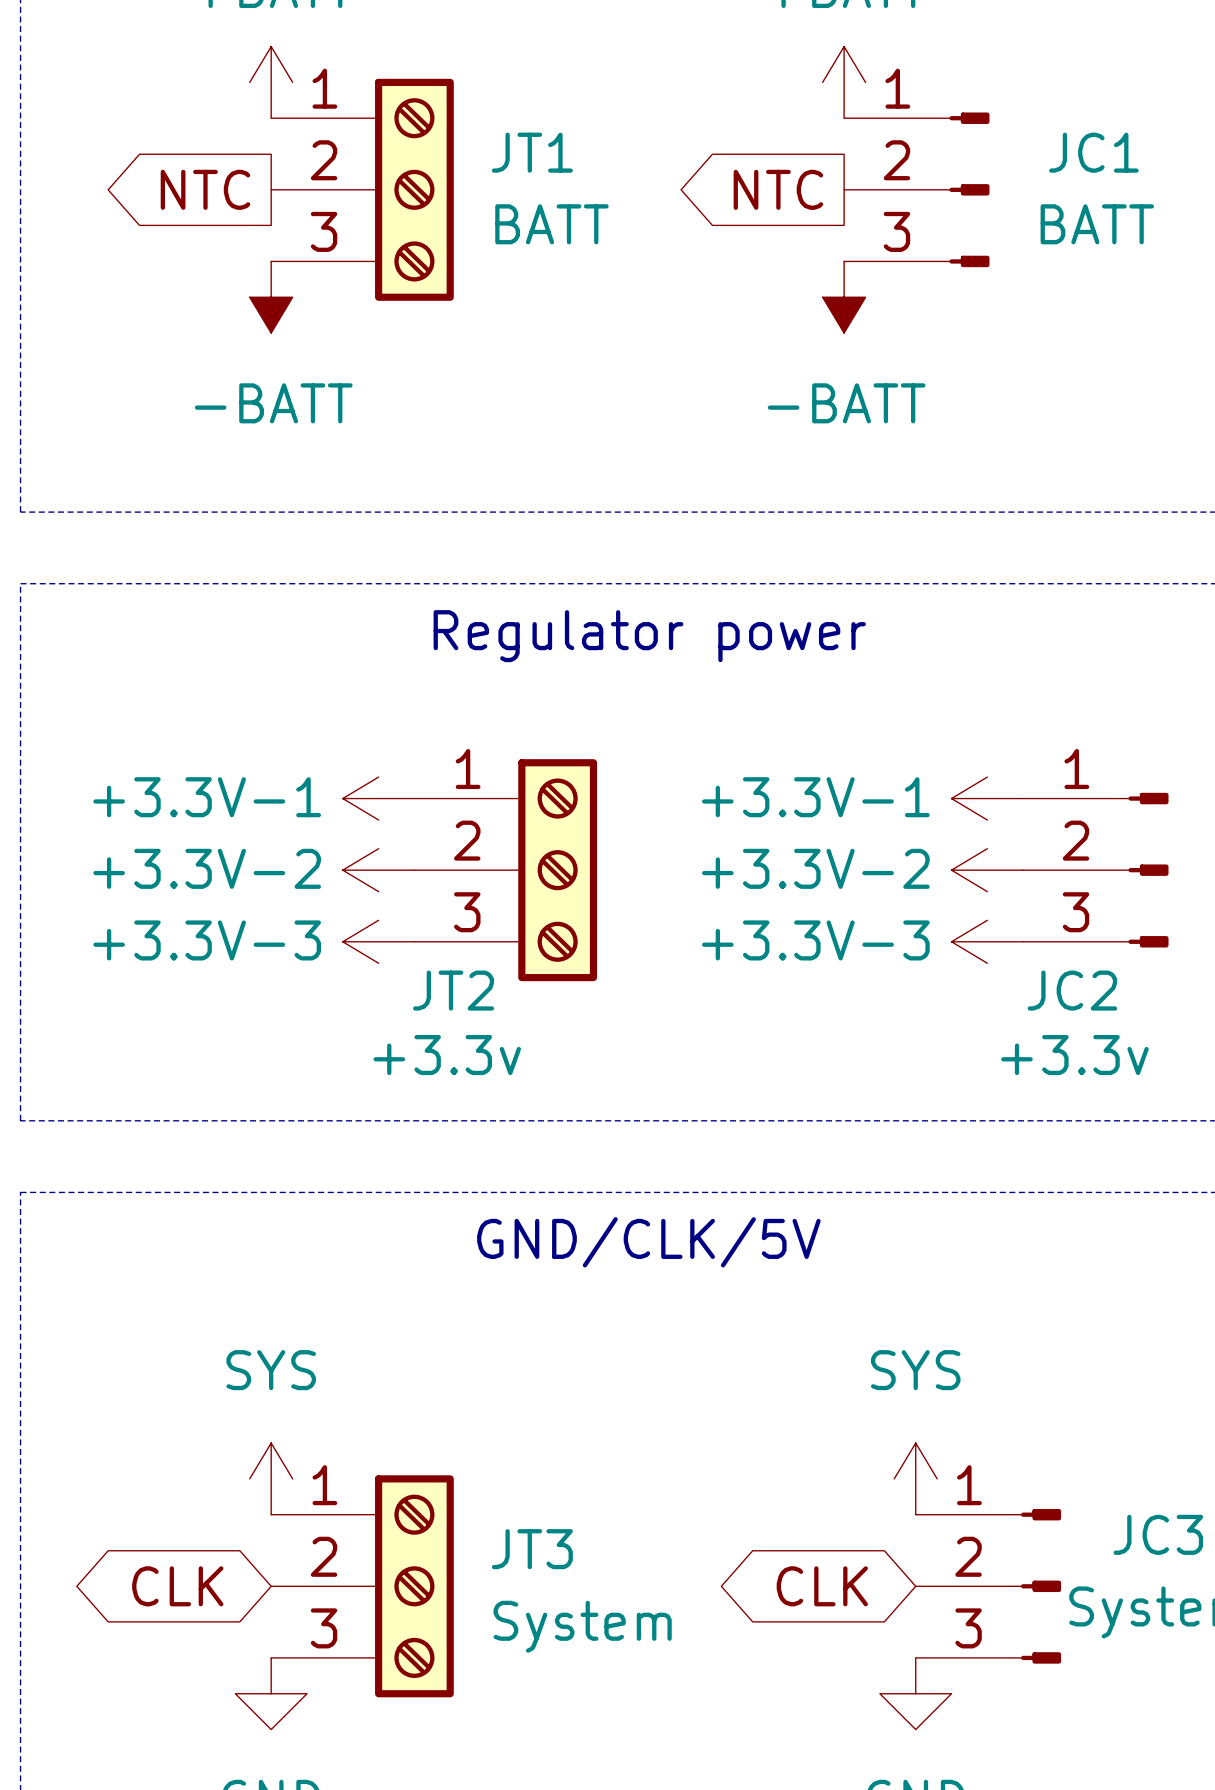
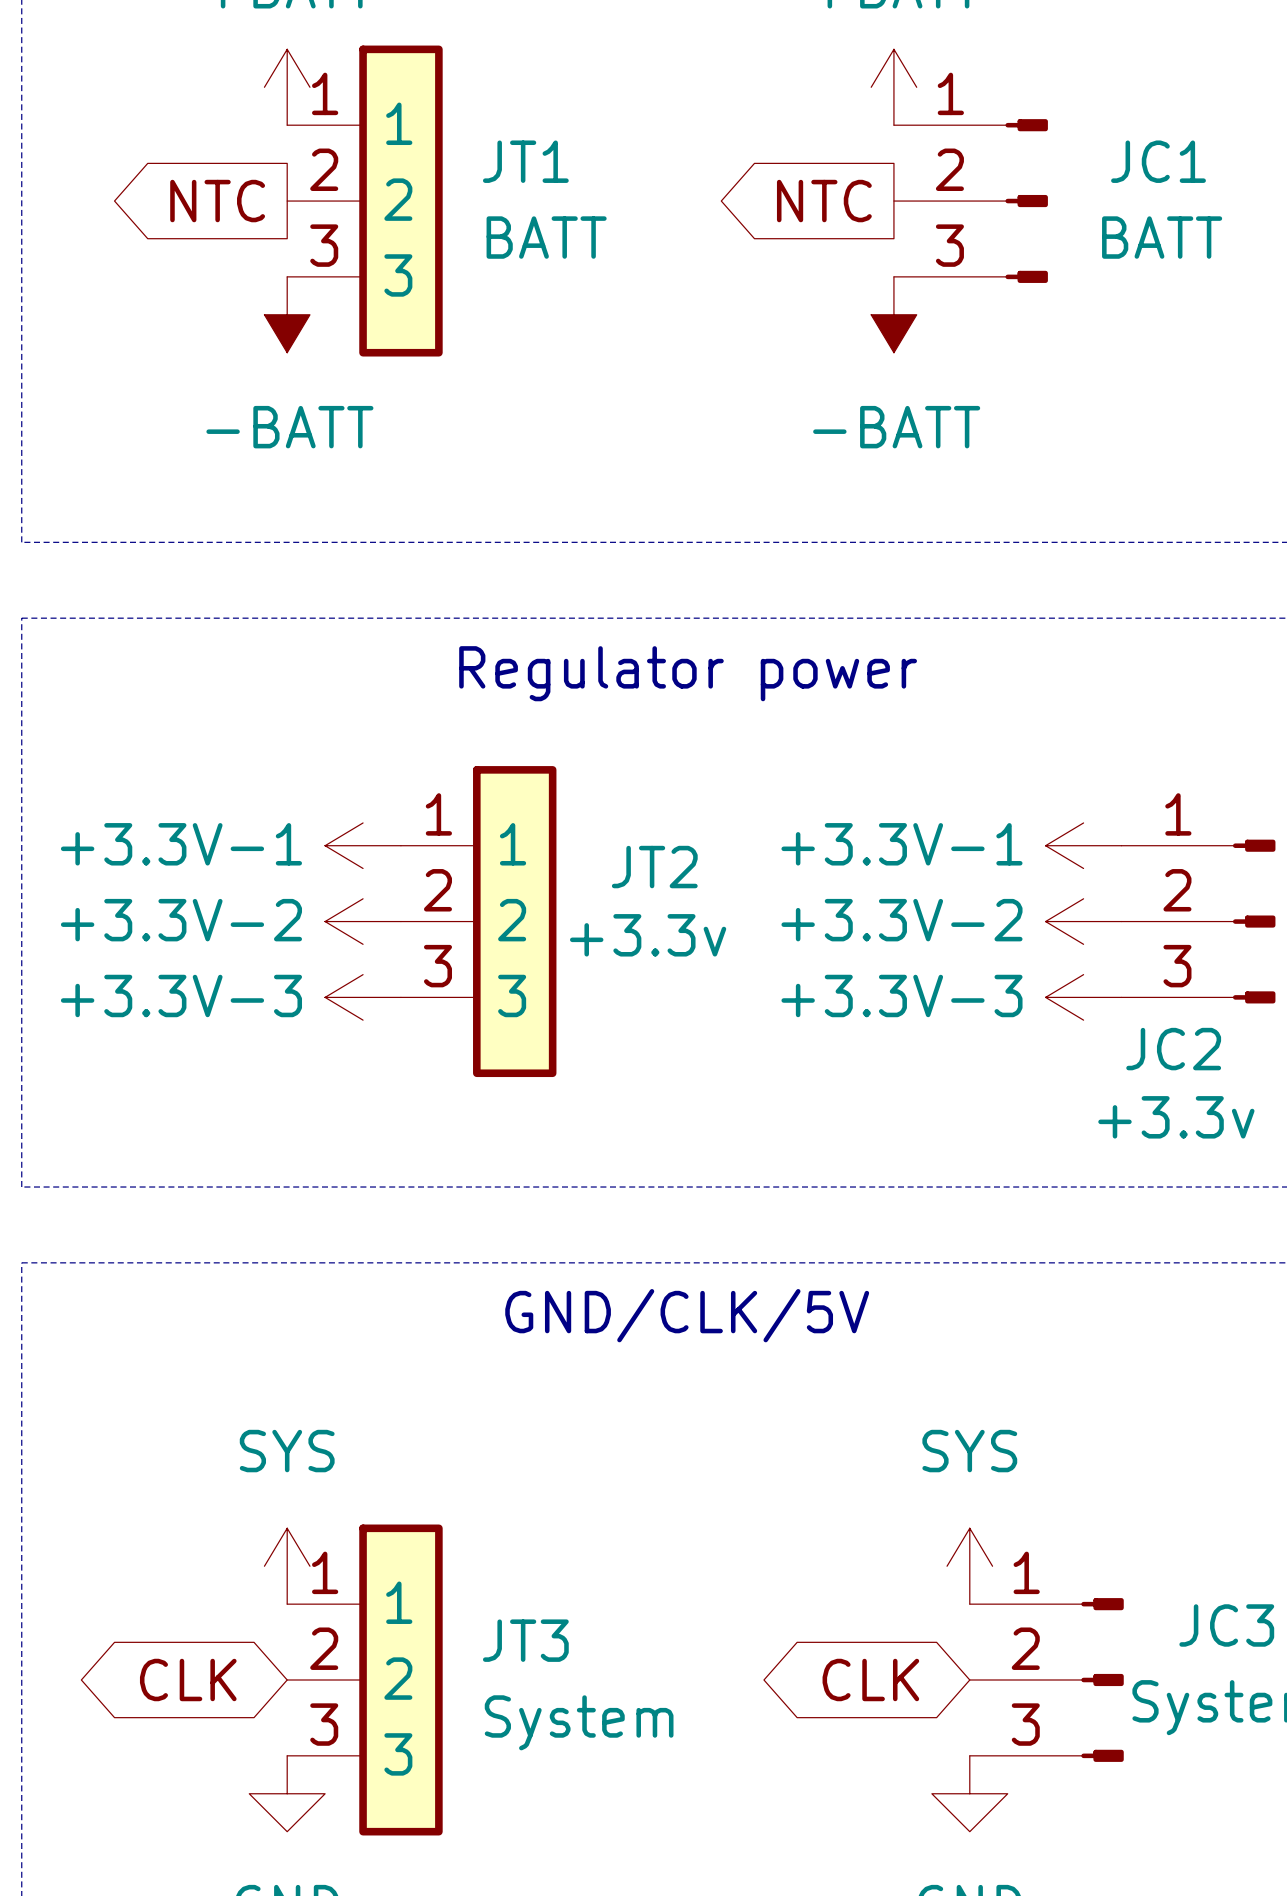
JT1 symbol: [271, 78, 454, 301] -> [287, 45, 443, 357]
JT2 symbol: [414, 759, 598, 982] -> [400, 766, 557, 1078]
power symbol position: +3.3V-1 (378, 798) -> +3.3V-1 (363, 845)
power symbol position: +3.3V-1 (987, 798) -> +3.3V-1 (1083, 845)
power symbol position: +3.3V-2 (378, 870) -> +3.3V-2 (363, 921)
power symbol position: +3.3V-2 (987, 870) -> +3.3V-2 (1083, 921)
JC2 position: (1095, 870) -> (1198, 921)
power symbol position: +3.3V-3 (378, 941) -> +3.3V-3 (363, 997)
power symbol position: +3.3V-3 (987, 941) -> +3.3V-3 (1083, 997)
JT2 name position: JT2 (453, 990) -> JT2 (654, 867)
JT2 value position: +3.3v (447, 1055) -> +3.3v (648, 935)
JT3 symbol: [271, 1475, 454, 1698] -> [287, 1524, 443, 1836]

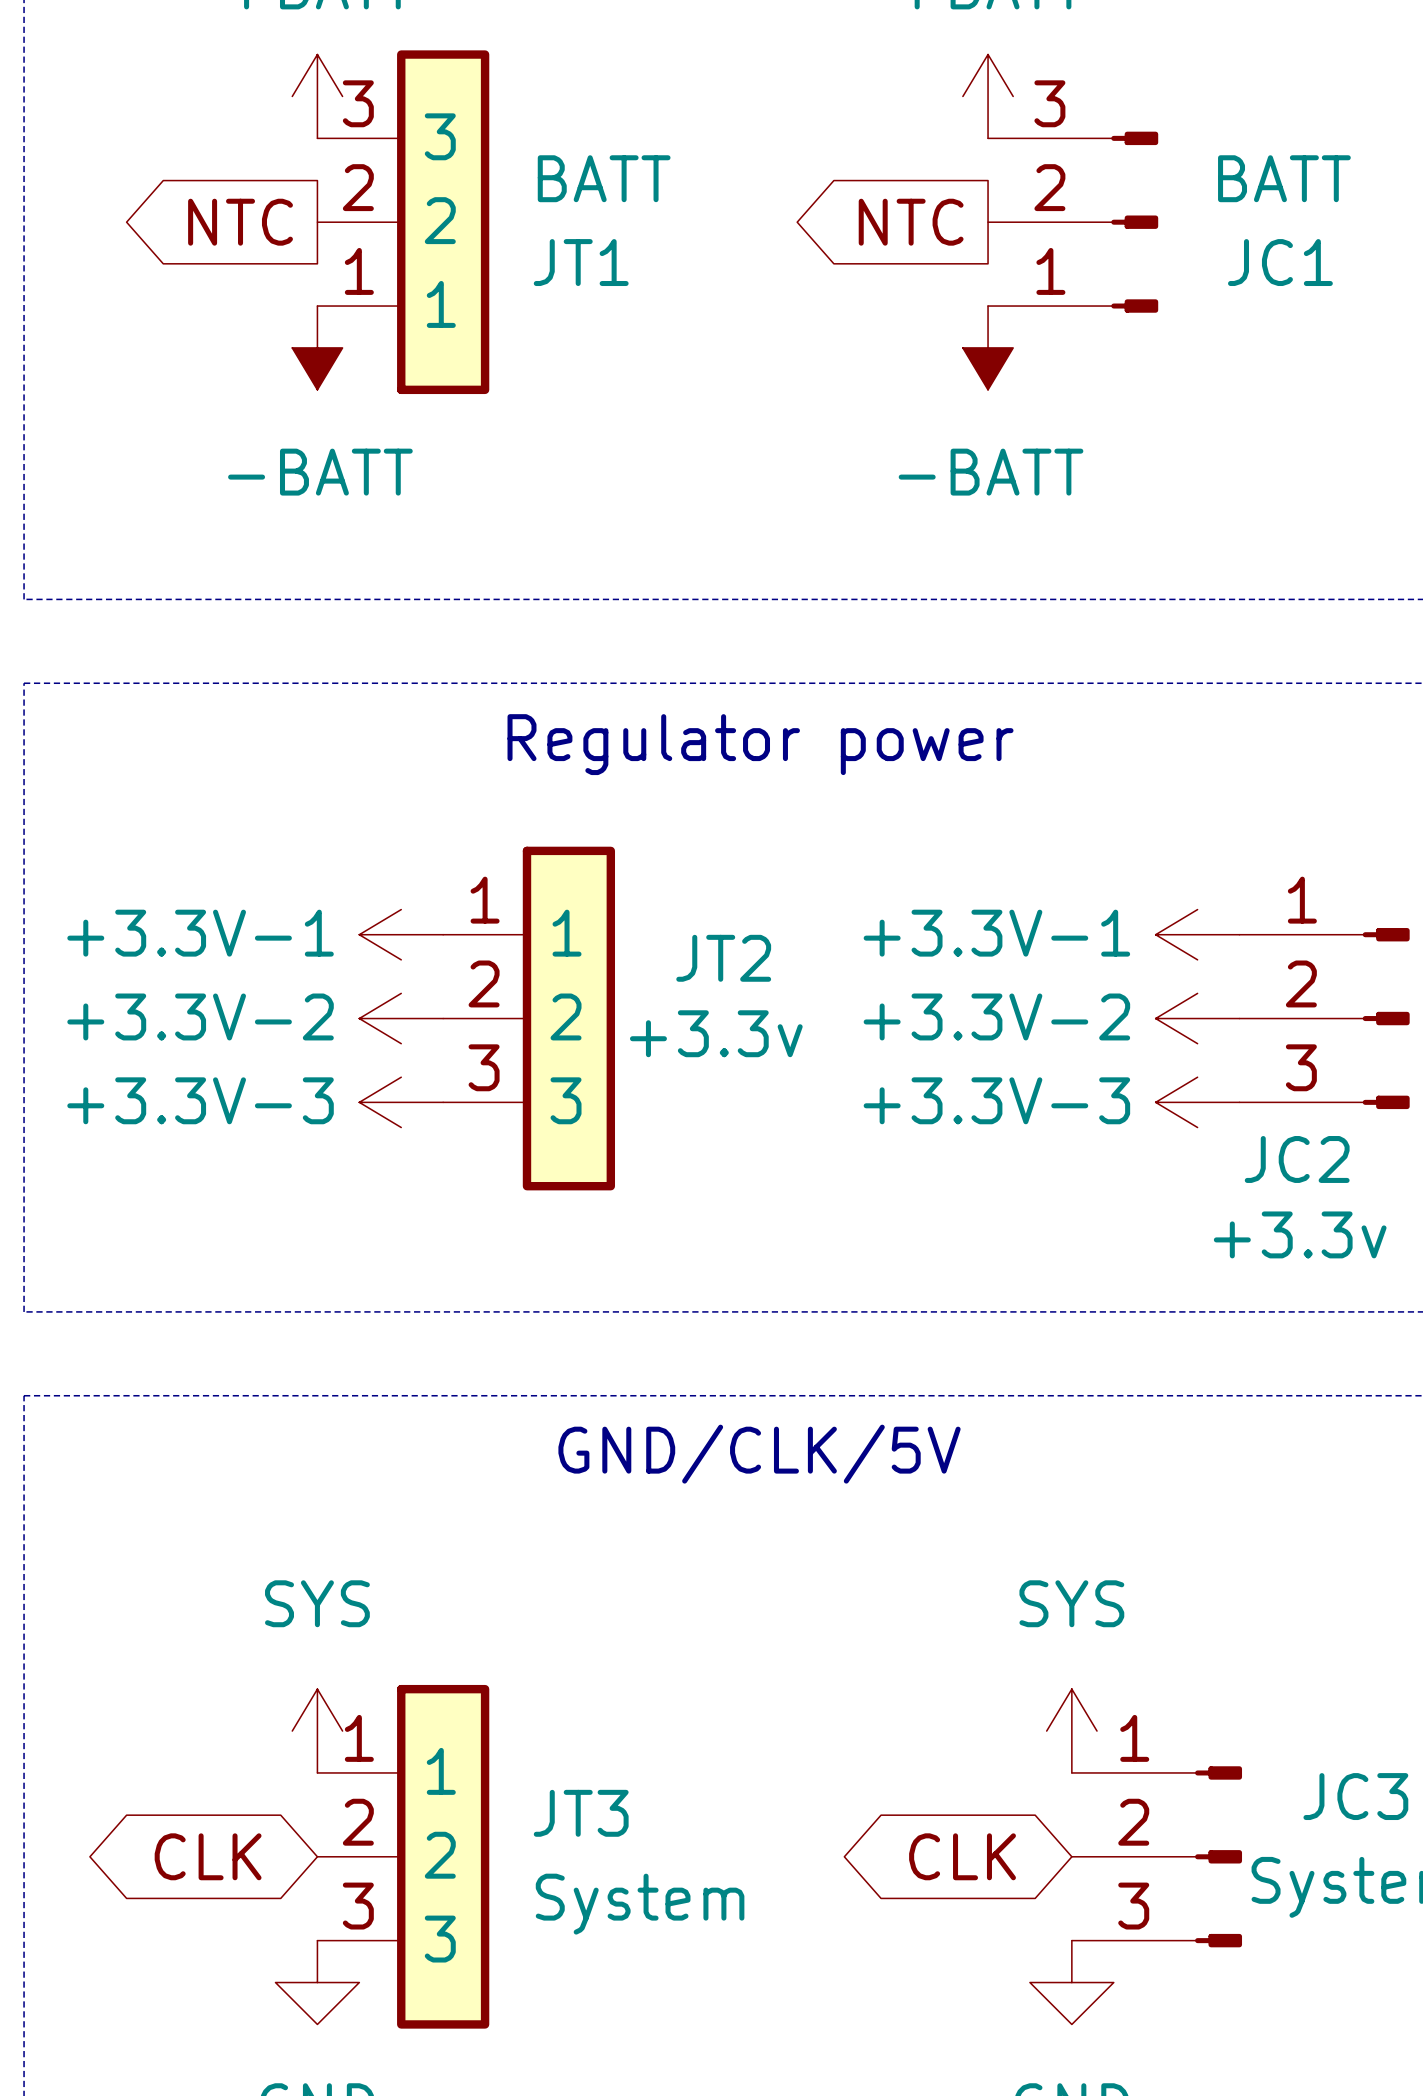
JT1 flip: as is (400, 201) -> up-down (443, 222)
JC1 flip: as is (1026, 201) -> up-down (1134, 222)

